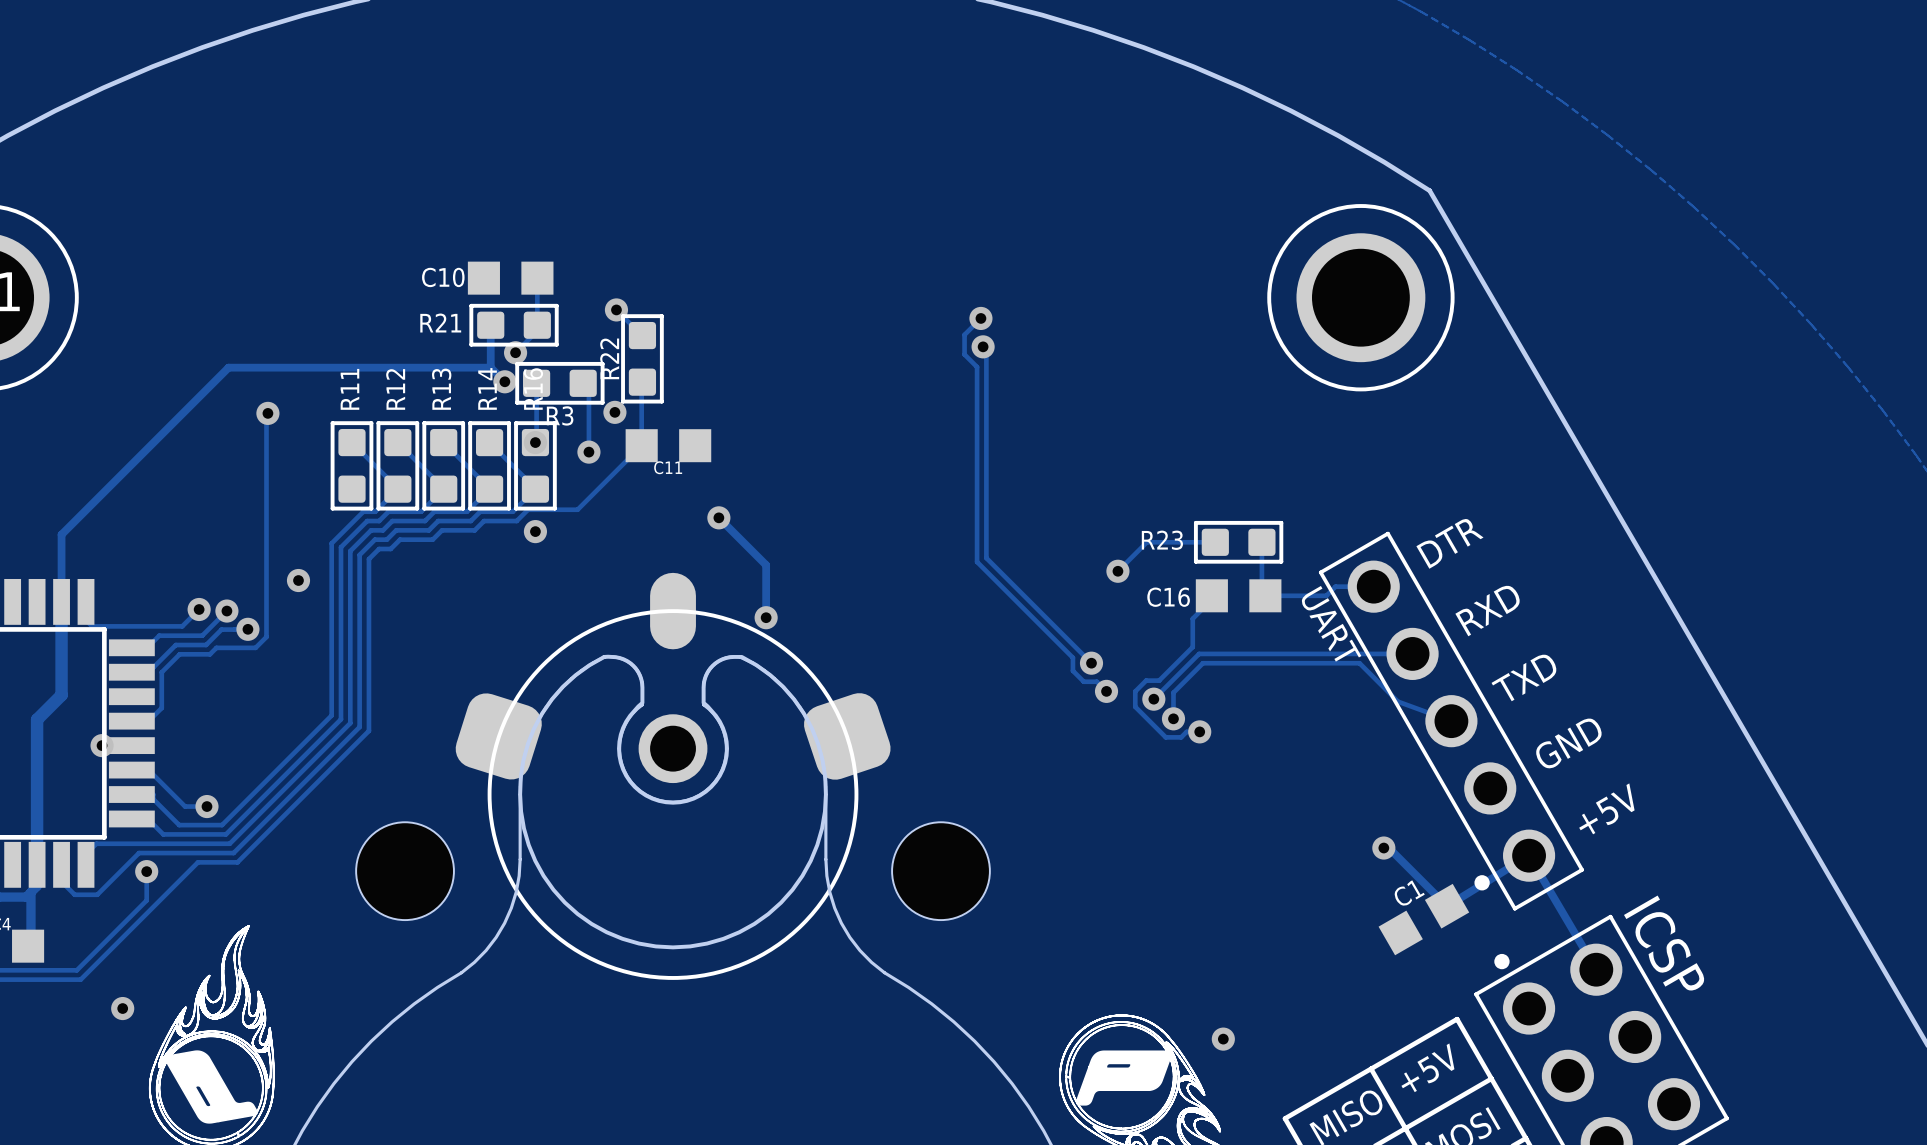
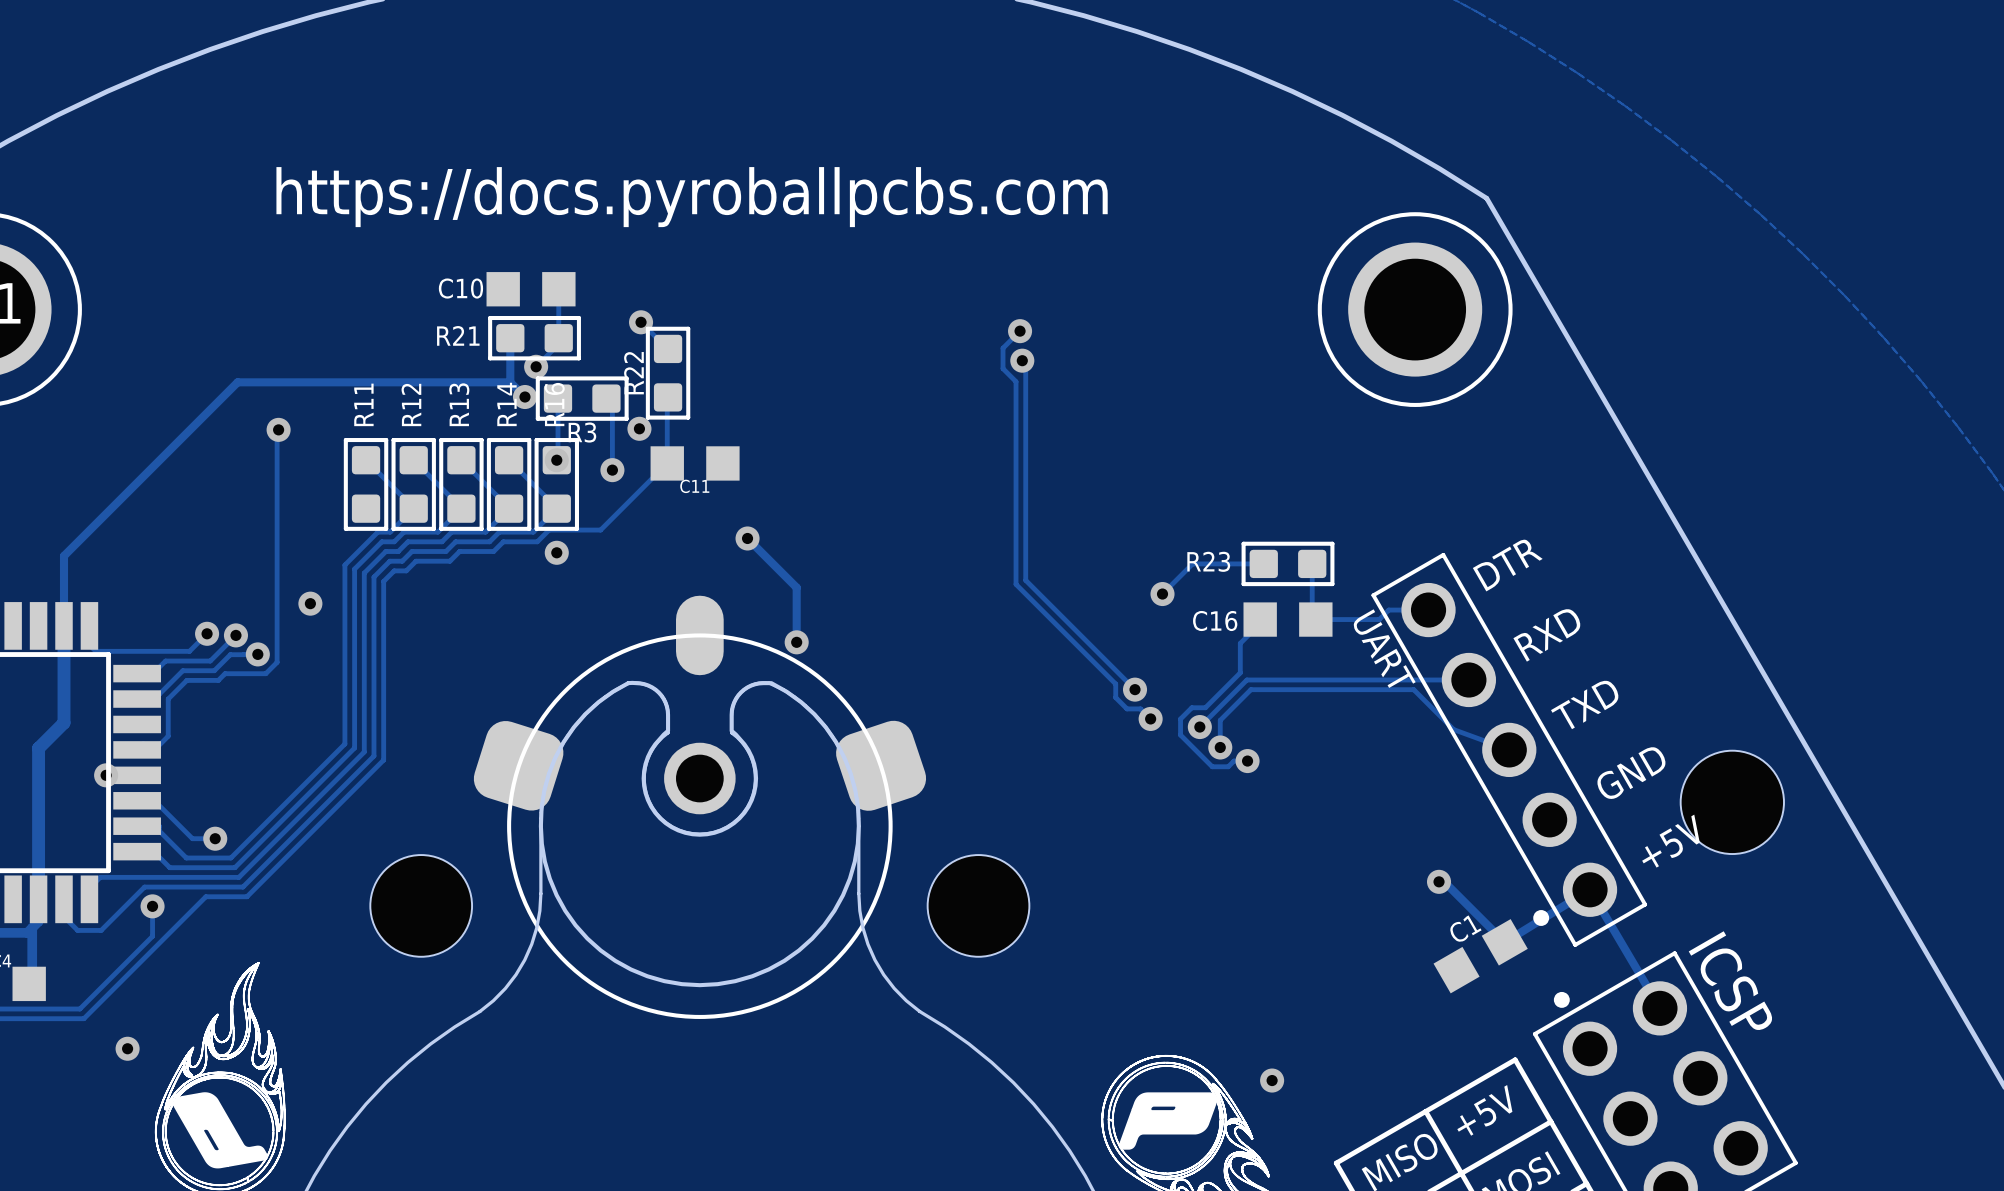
text: none -> https://docs.pyroballpcbs.com (692, 197)
hole: none -> (1732, 802)

